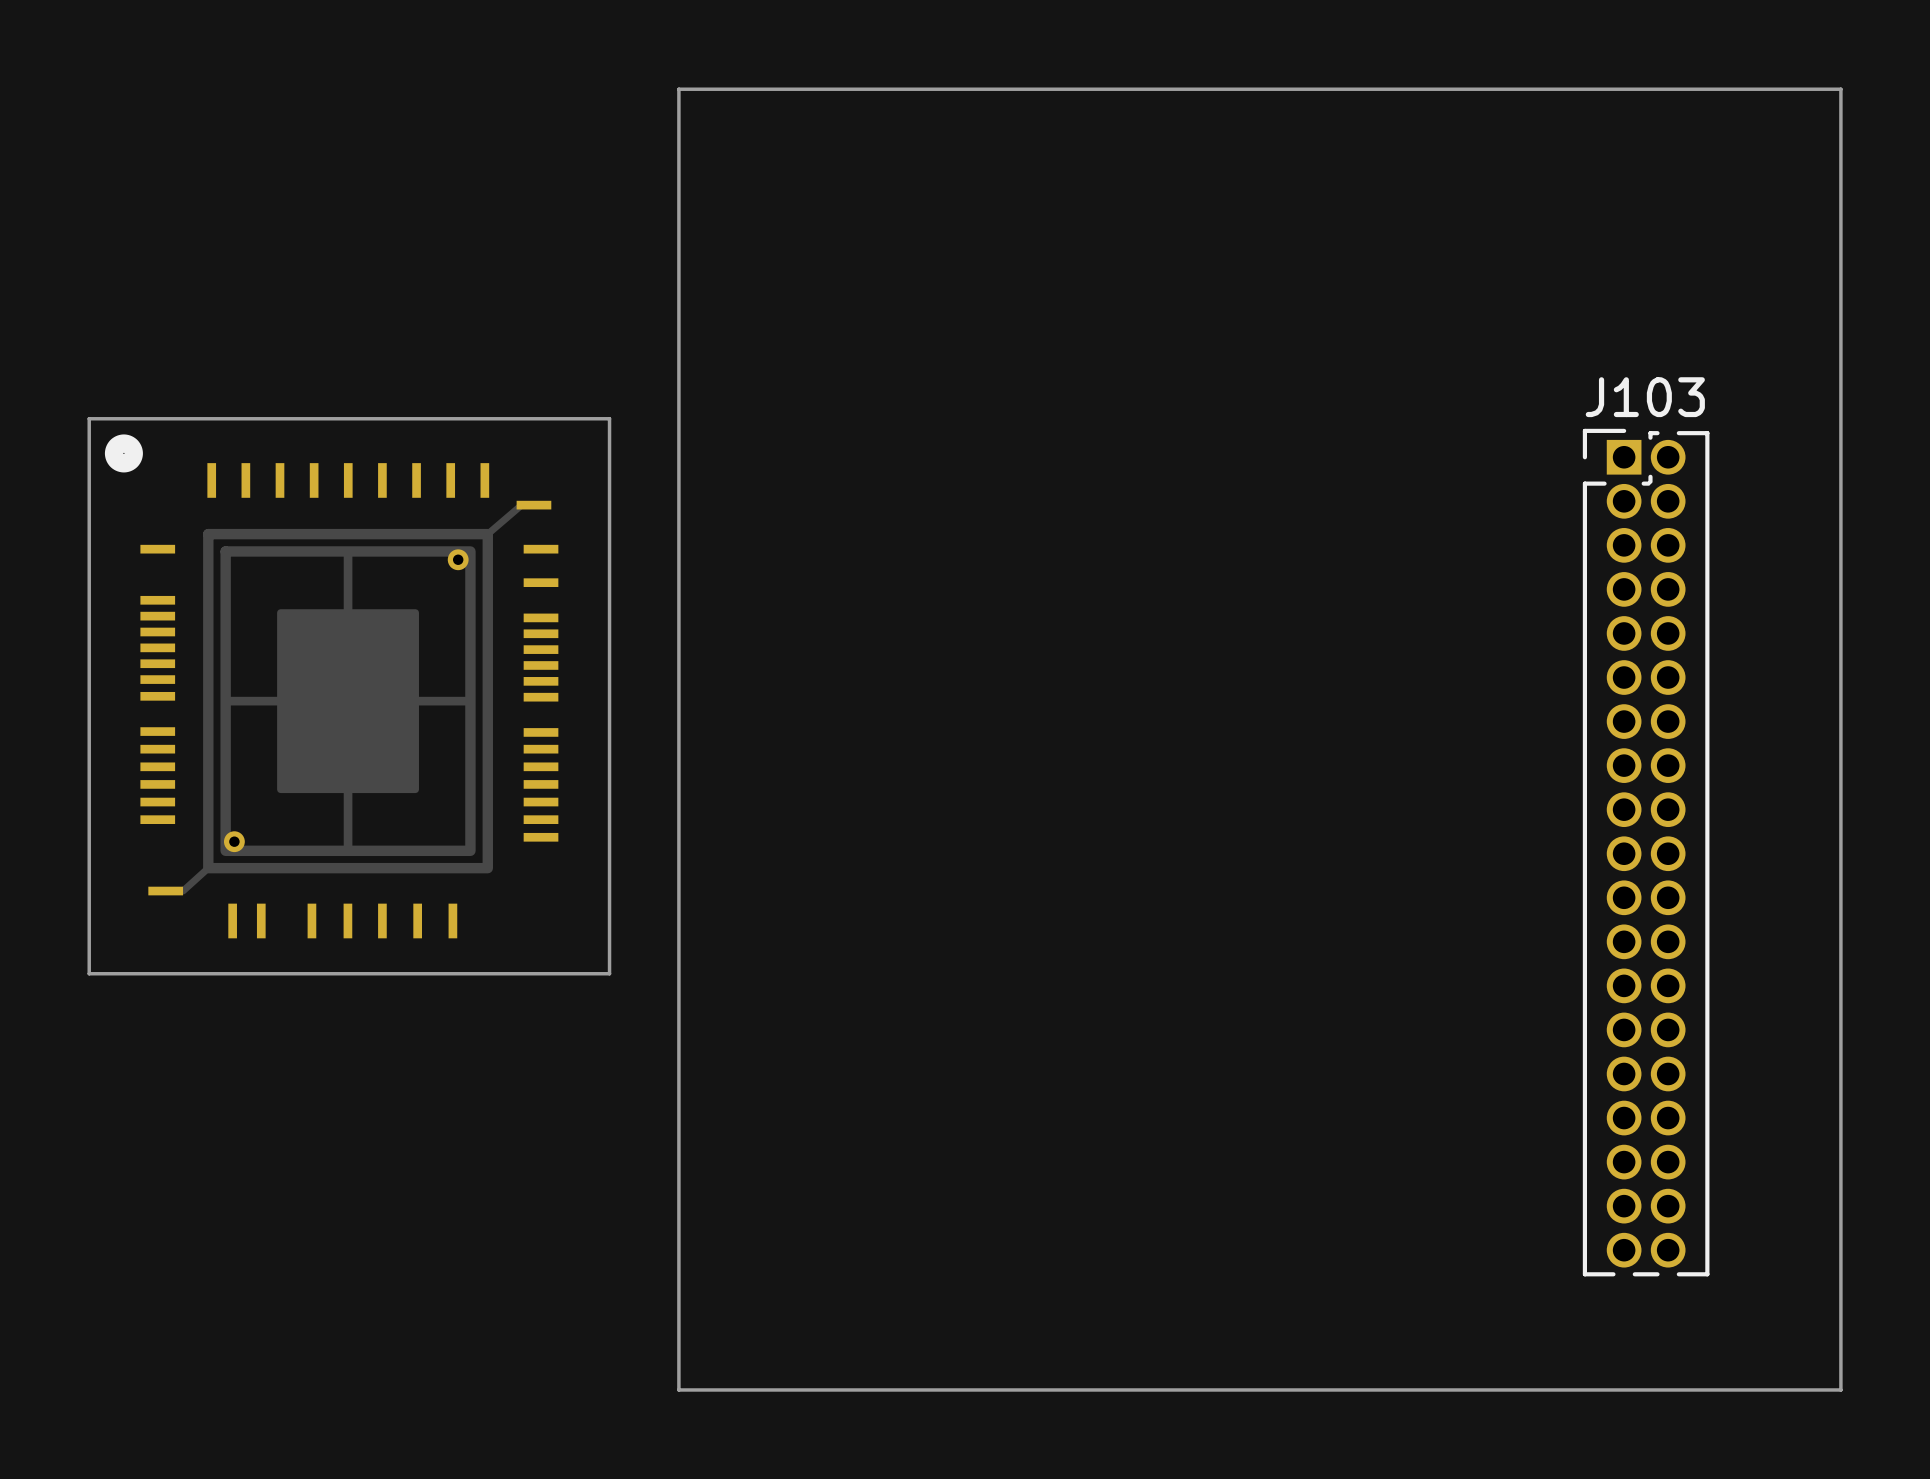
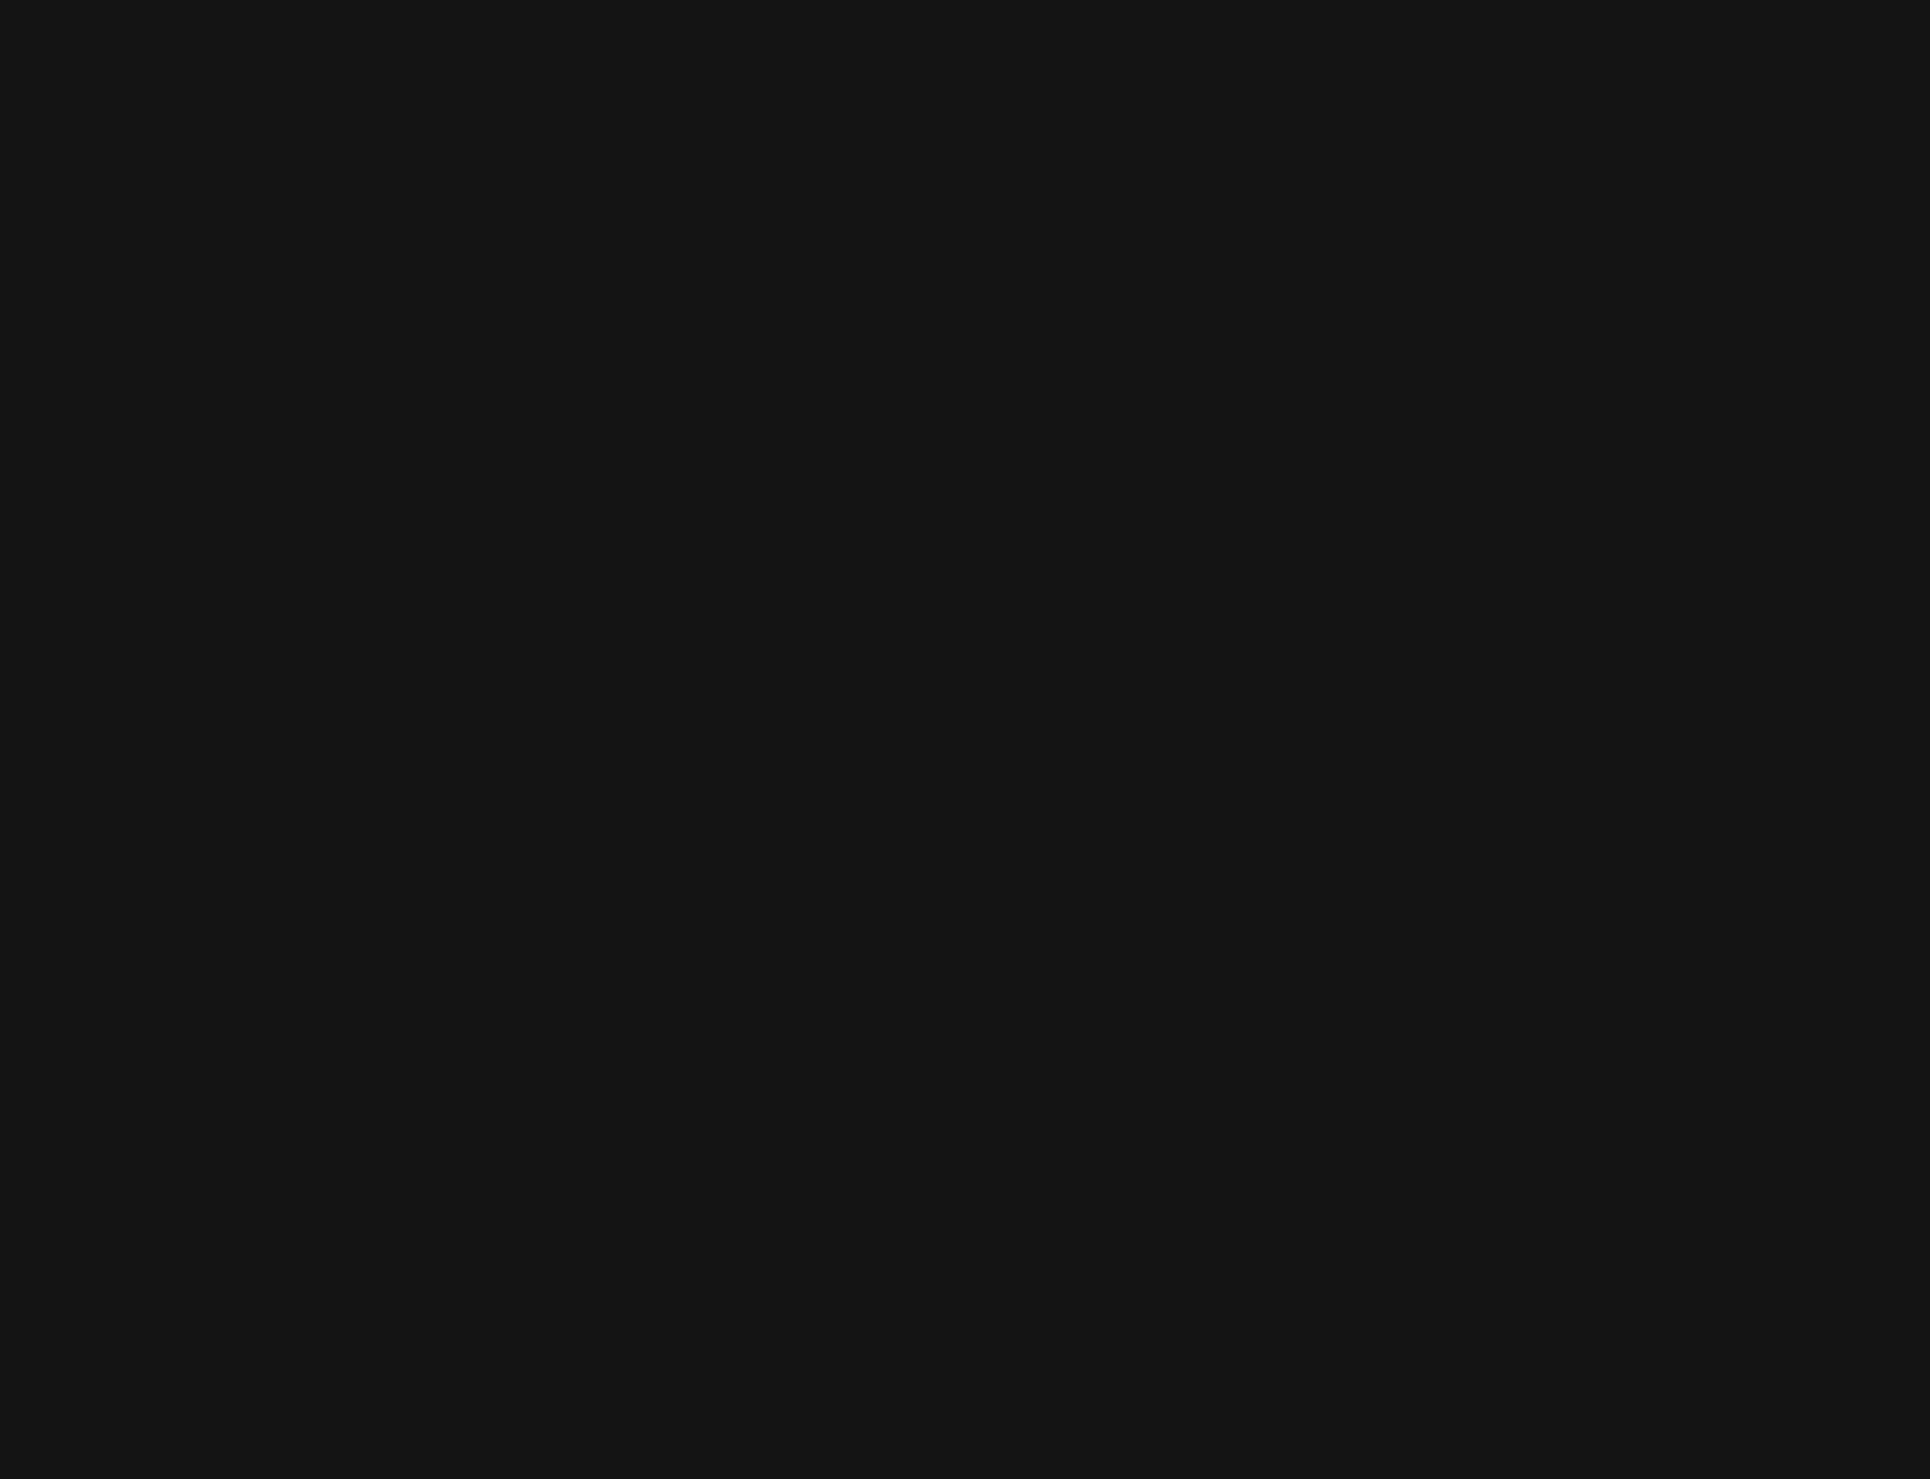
board edge: (678, 89) (1840, 89) (1840, 1389) (678, 1389) (678, 89) -> none
board edge: (89, 418) (89, 973) (609, 973) (609, 418) (89, 418) -> none
drawing: [104, 434, 143, 473] -> none
part: (349, 700) -> none
J103: (1646, 852) -> none

